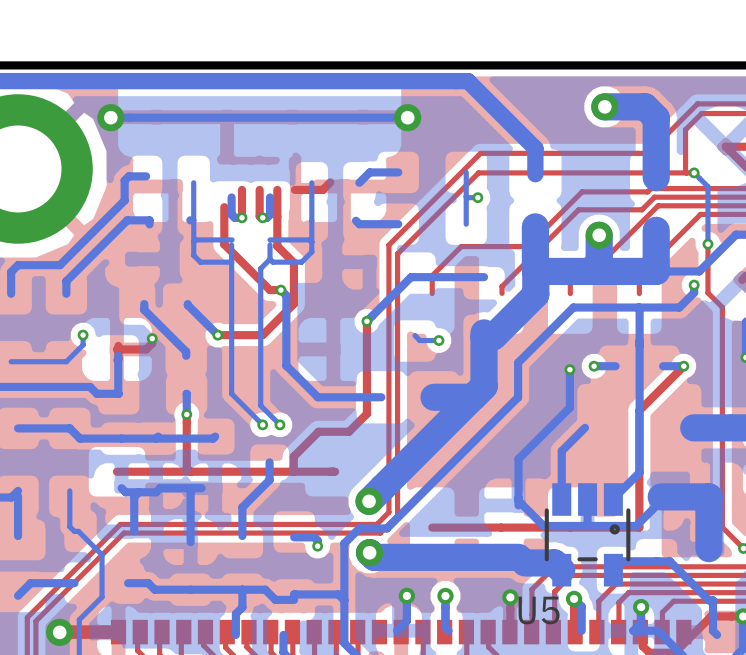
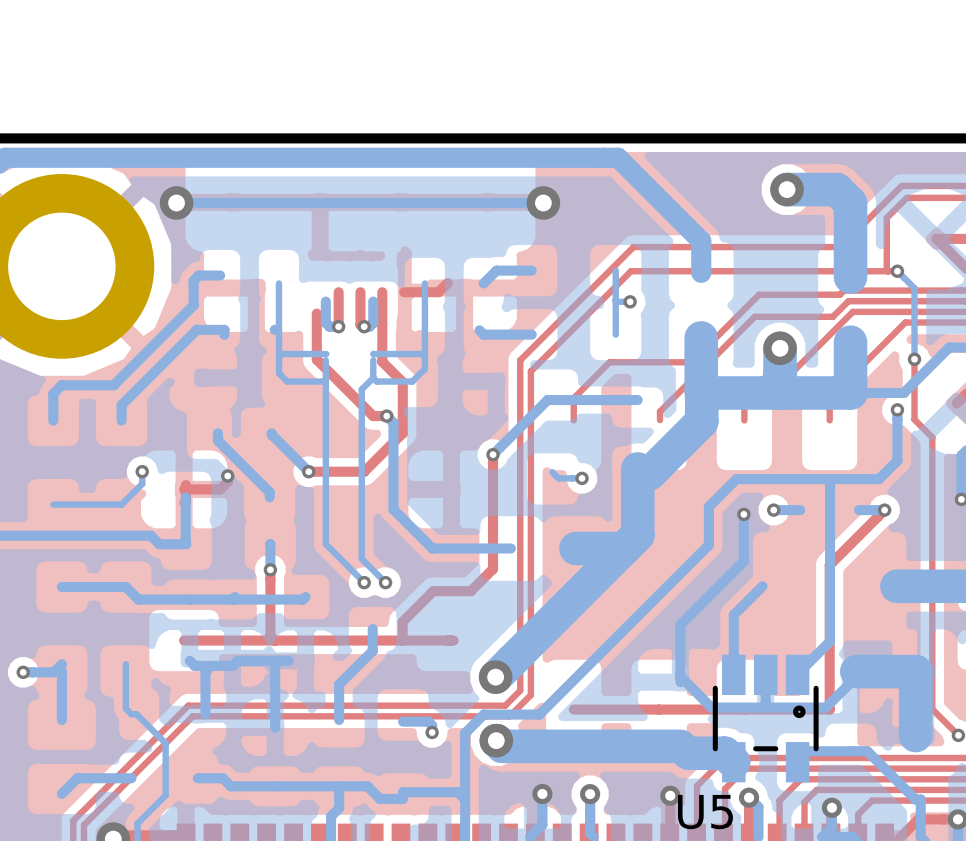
bottom track: (694, 292) (679, 307) (573, 307) (518, 362) (518, 397) (386, 528) (359, 528) (344, 543) (344, 546) -> (897, 419) (897, 460) (879, 479) (736, 479) (708, 506) (708, 545) (539, 714) (483, 714) (465, 733)
bottom track: (638, 307) (639, 341) -> none

